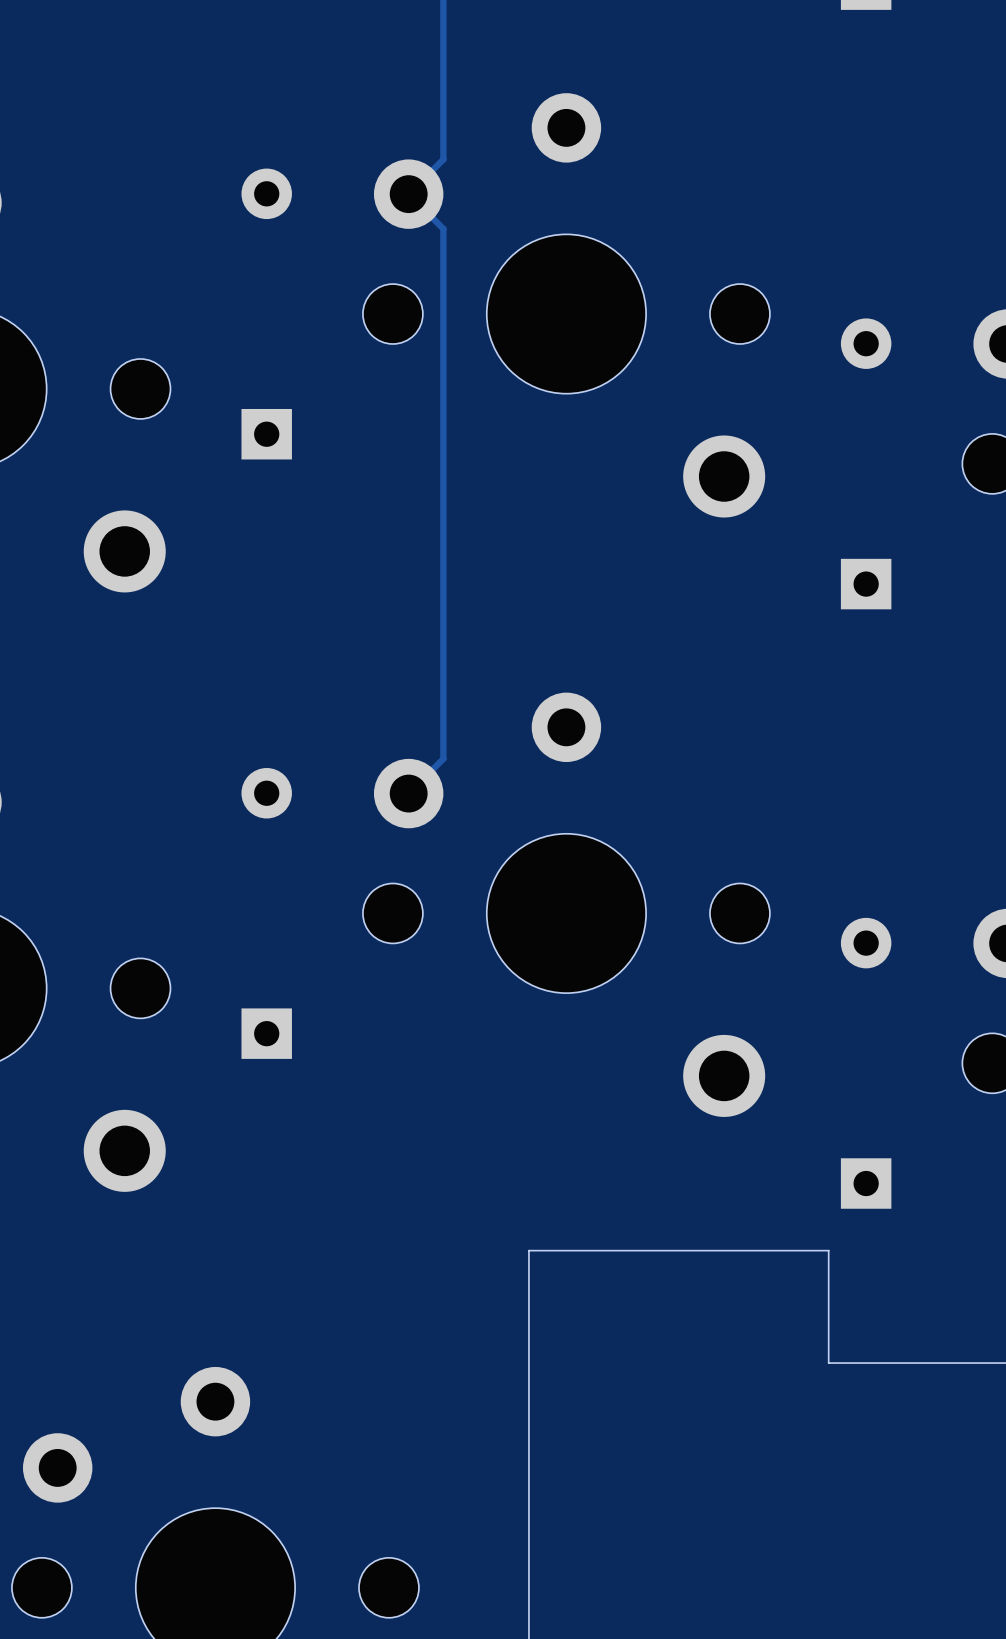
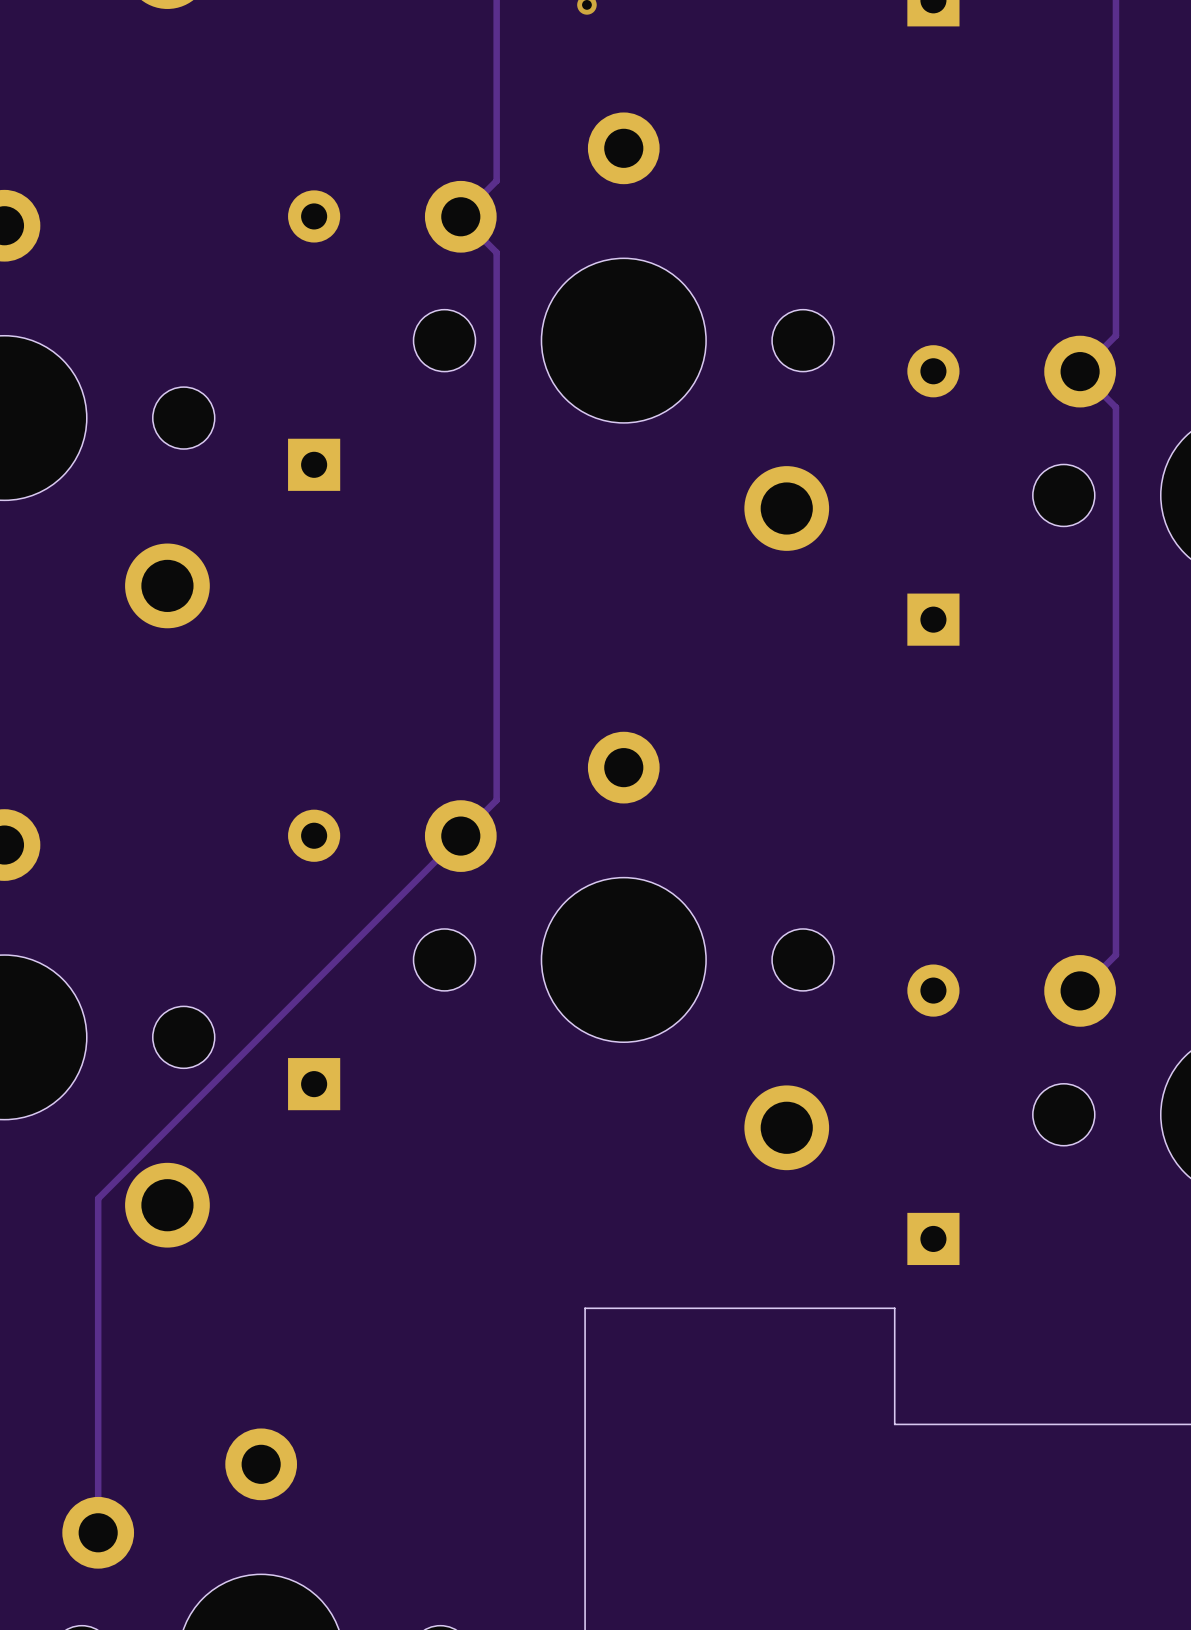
track: none -> (460, 836) (98, 1198) (98, 1532)

